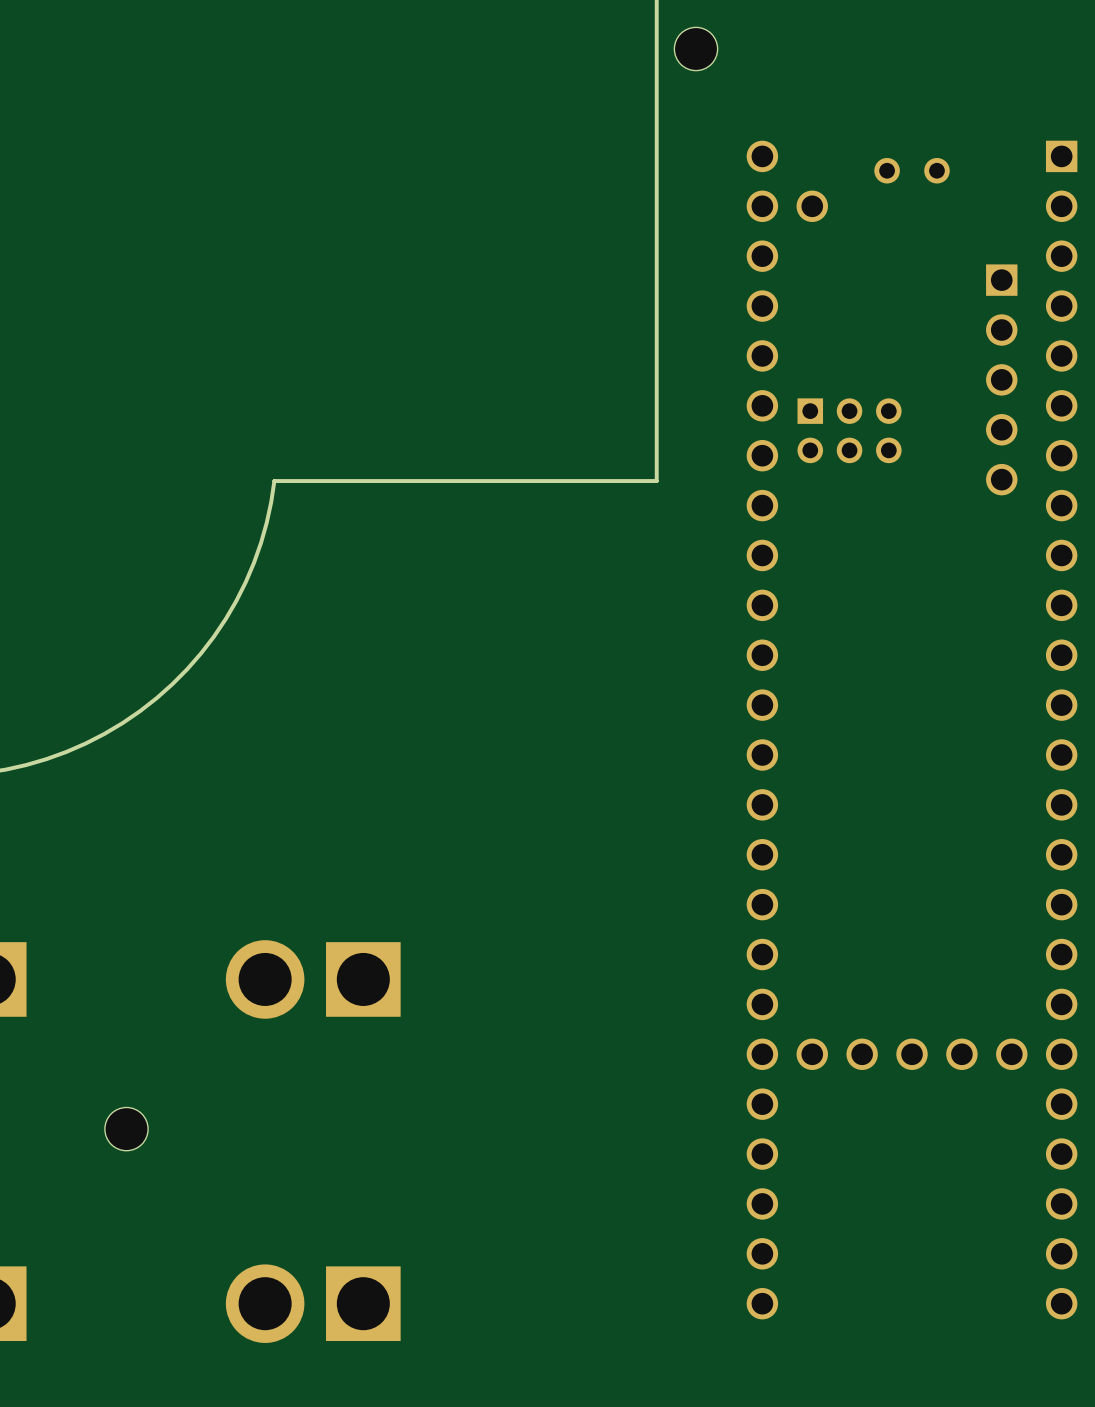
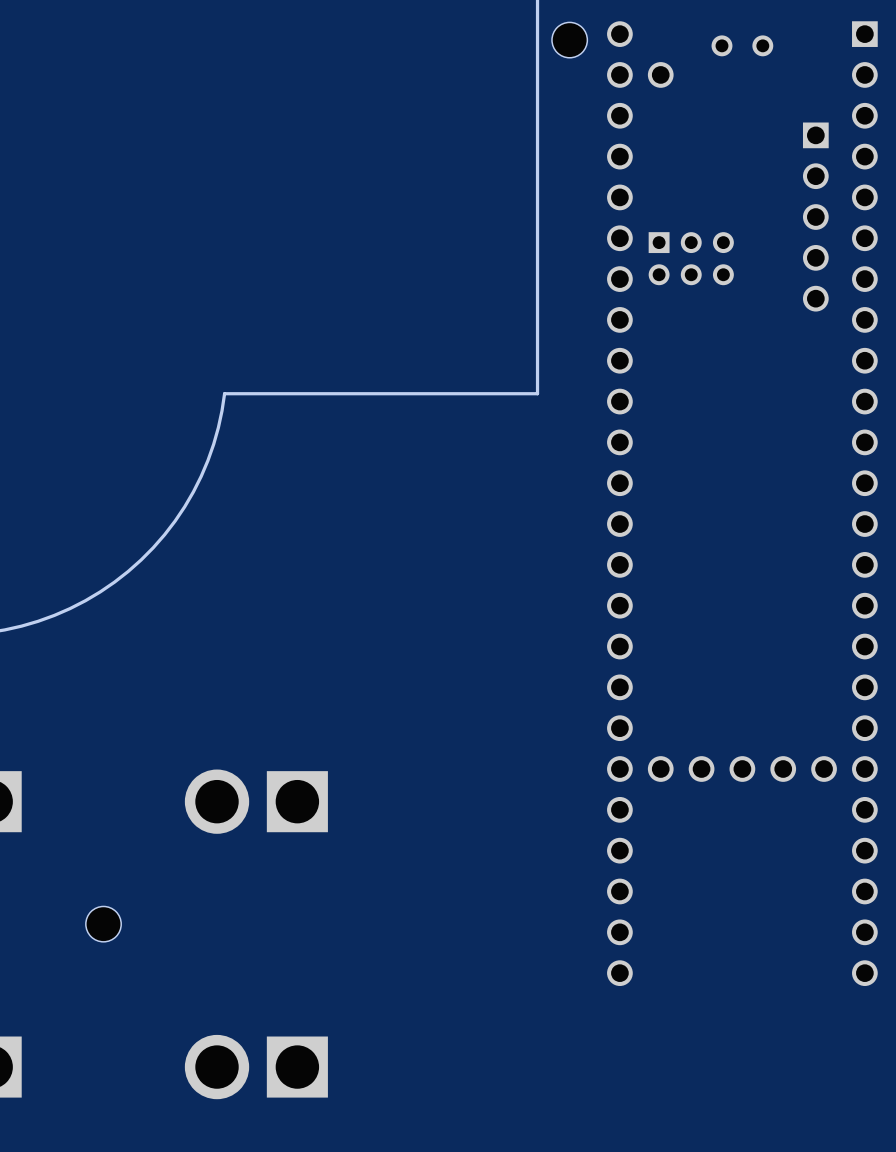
part position: (912, 730) -> (742, 503)

